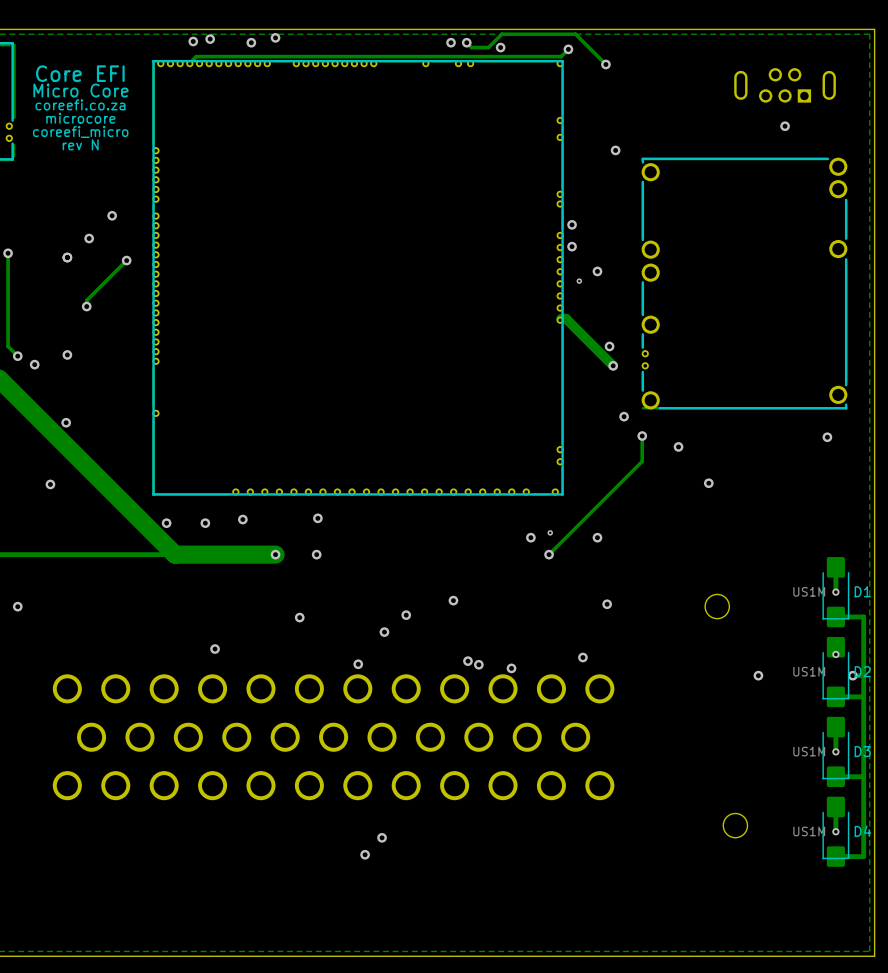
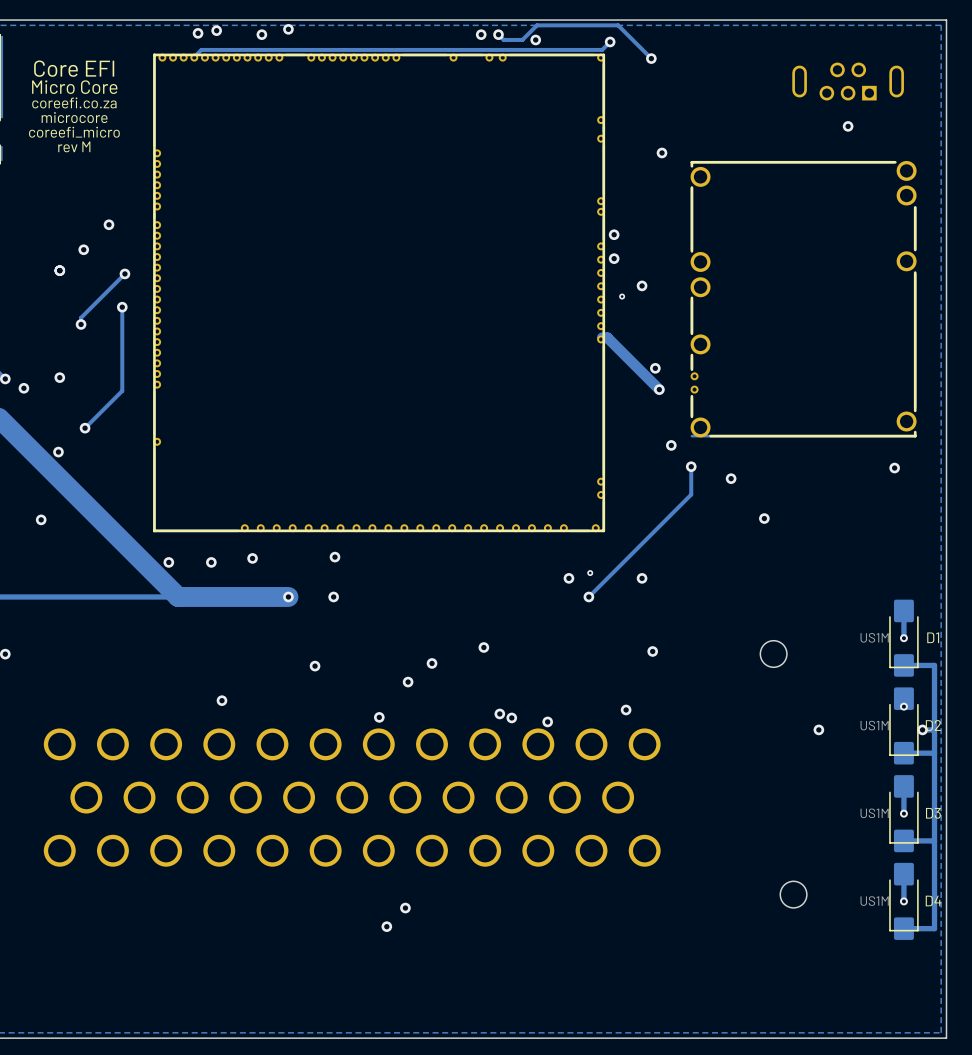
text: rev N (80, 144) -> rev M (74, 146)
track: none -> (122, 307) (122, 390) (85, 428)
via: none -> (122, 307)
via: none -> (85, 428)

